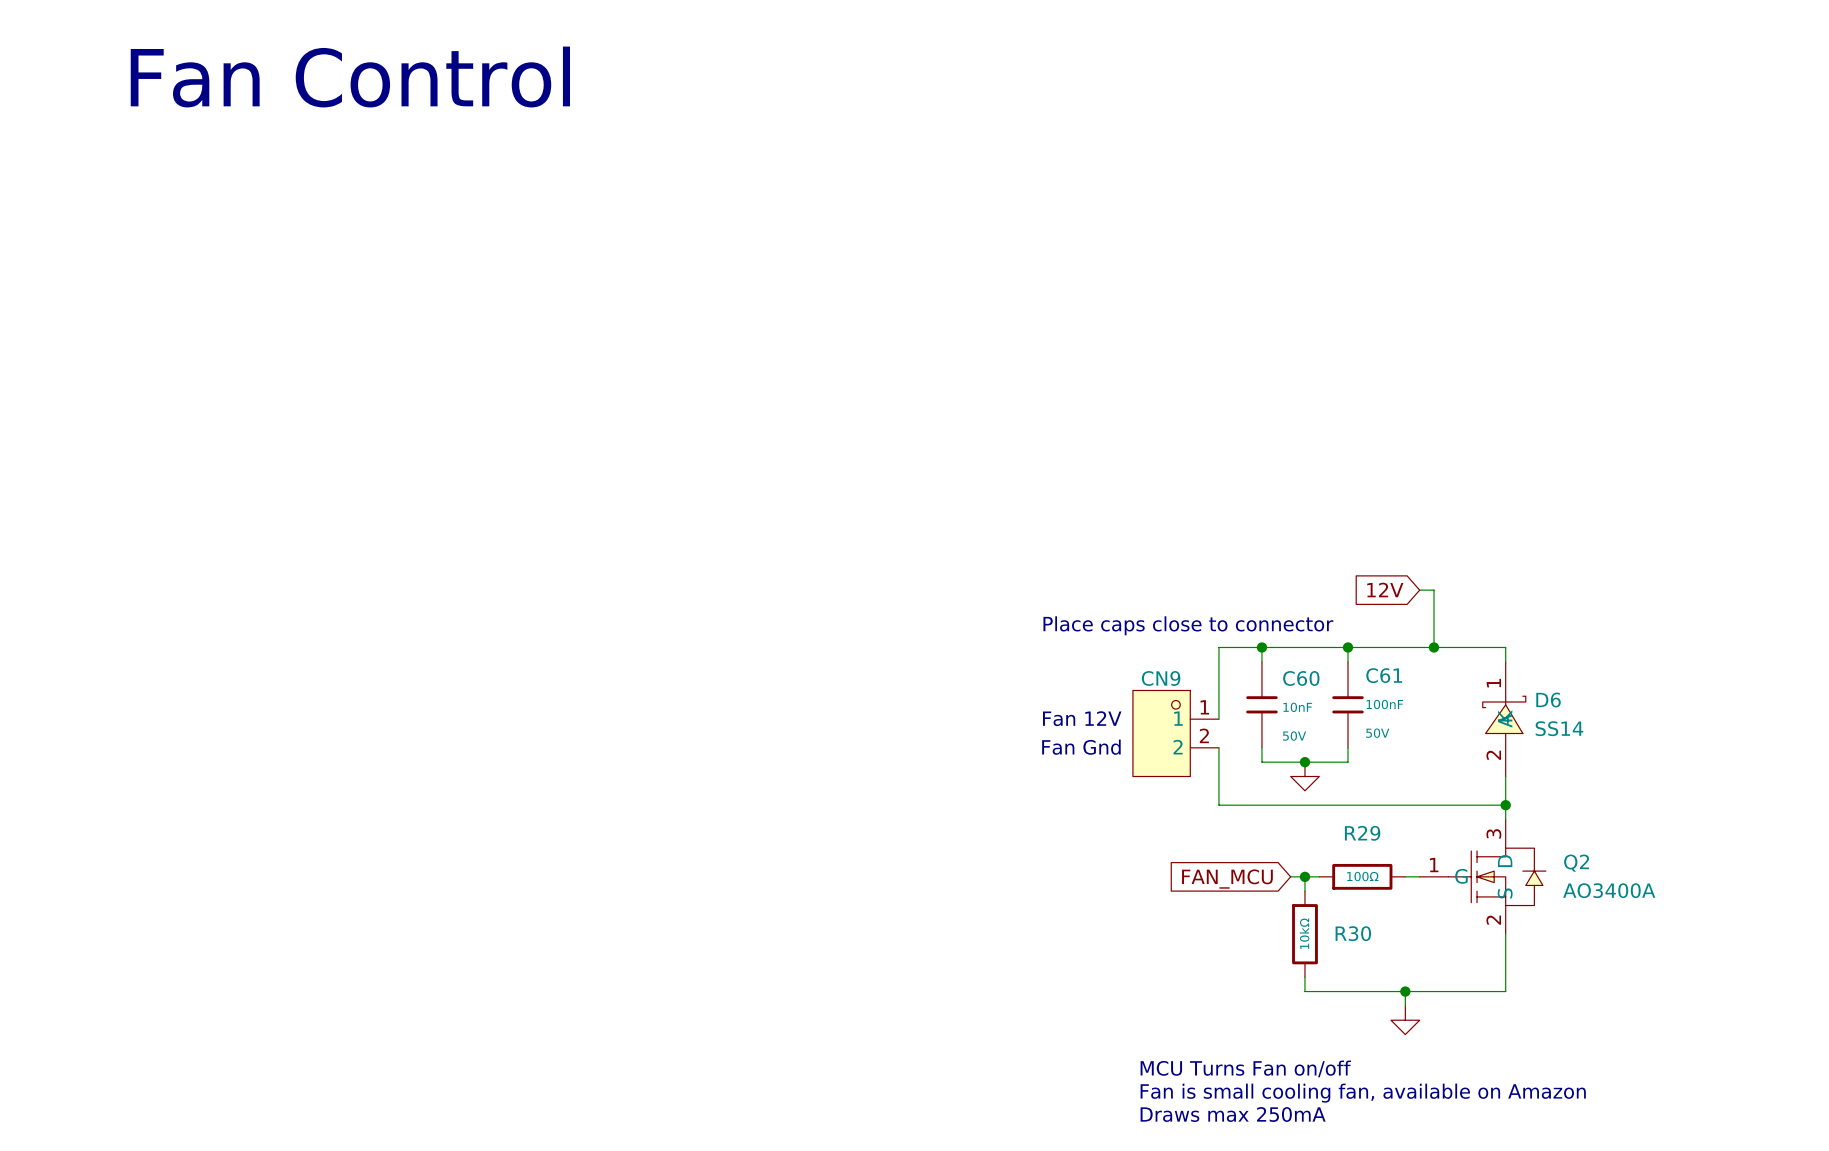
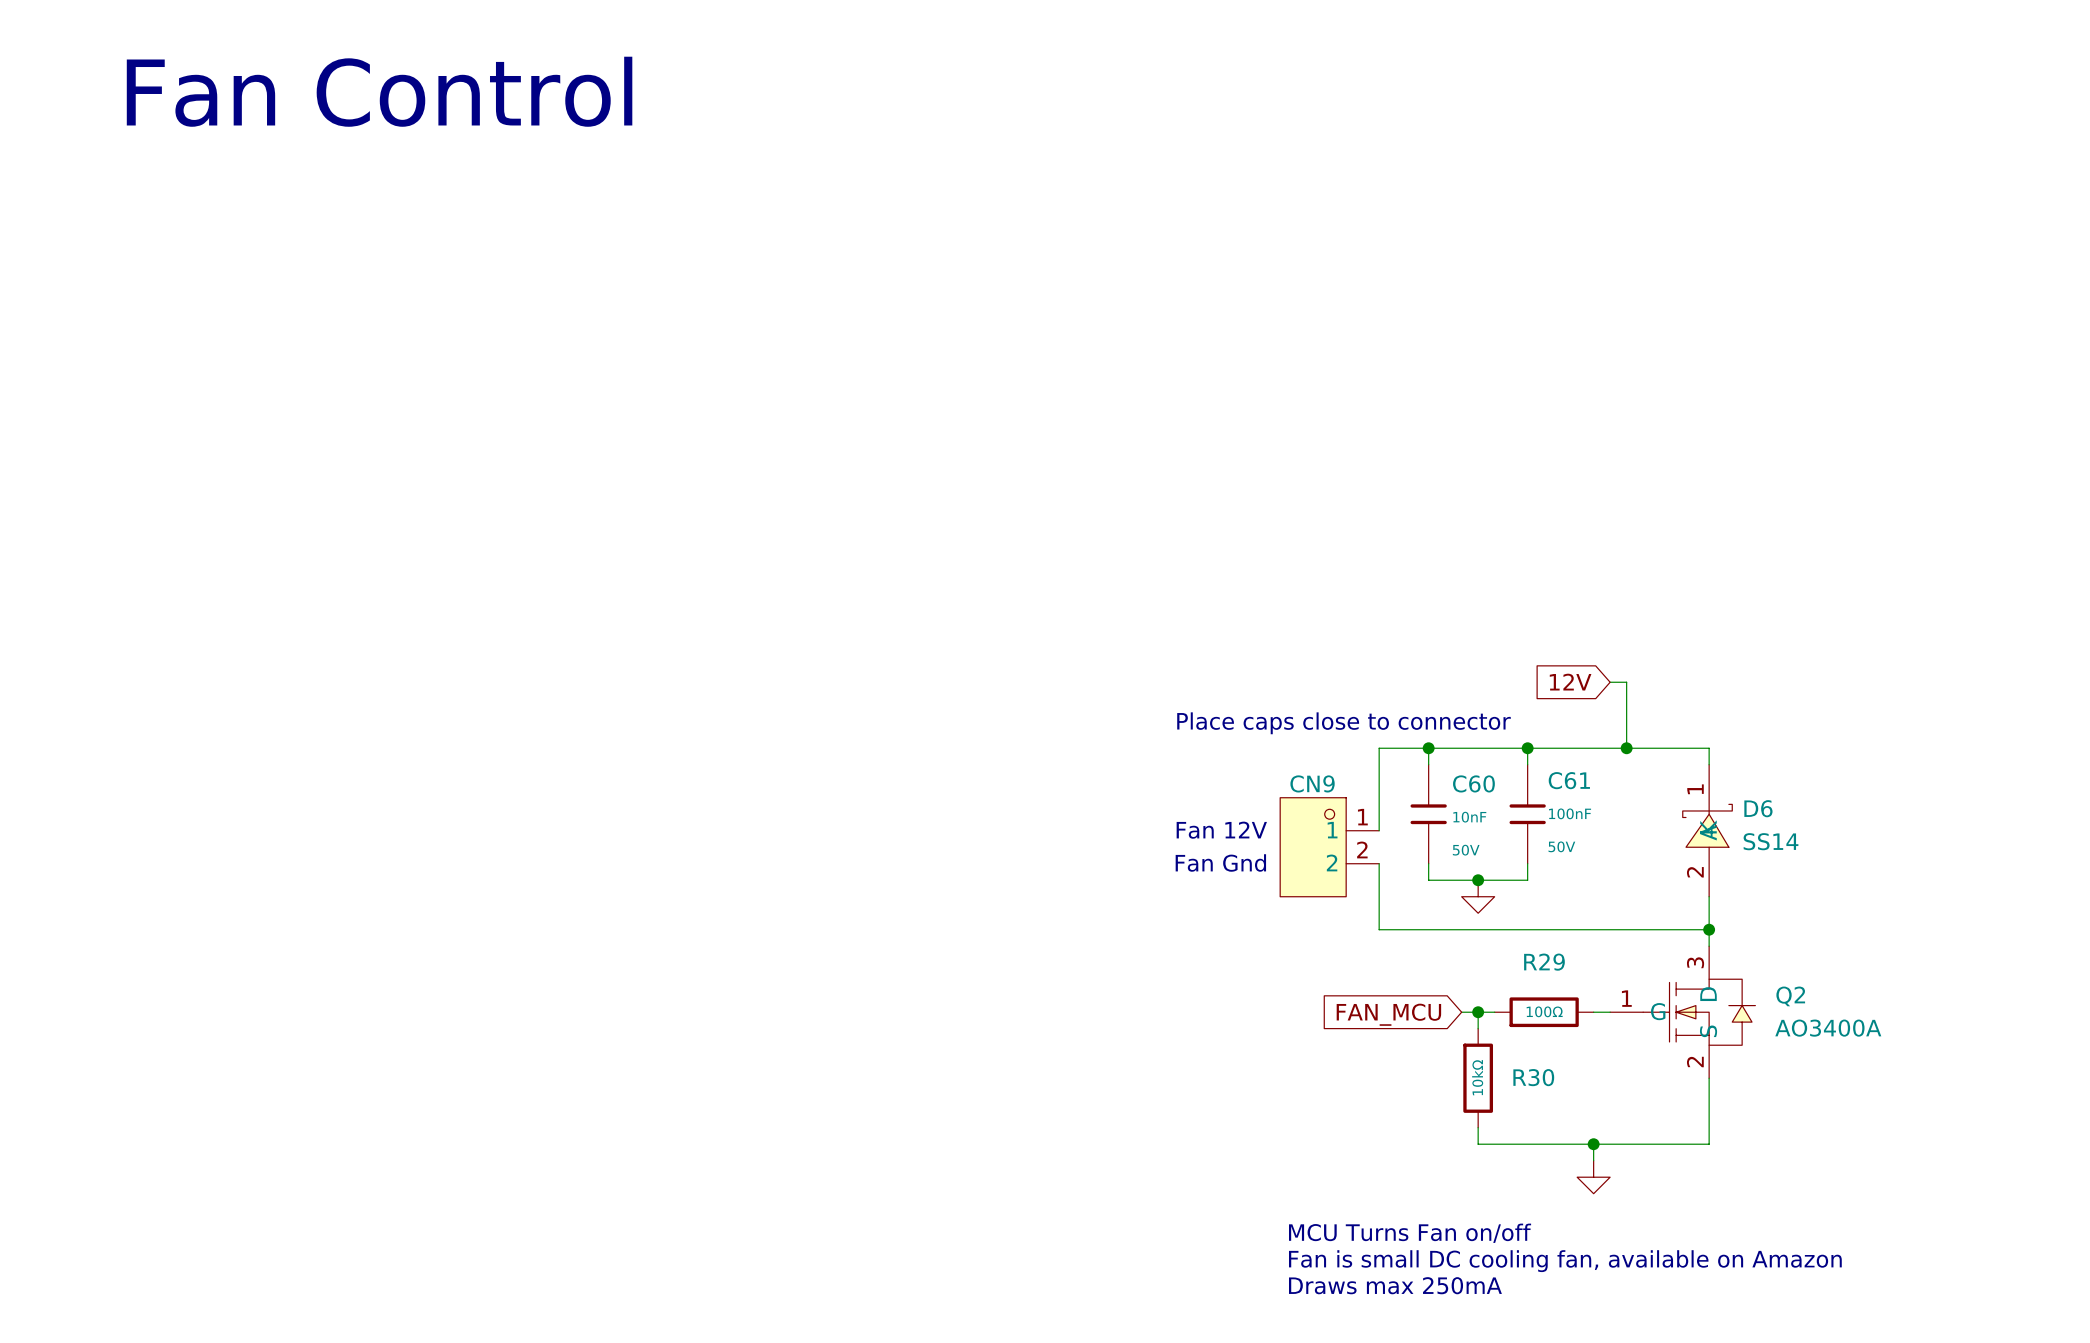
text: Fan is small cooling fan, available on Amazon (1363, 1093) -> Fan is small DC cooling fan, available on Amazon (1565, 1261)

